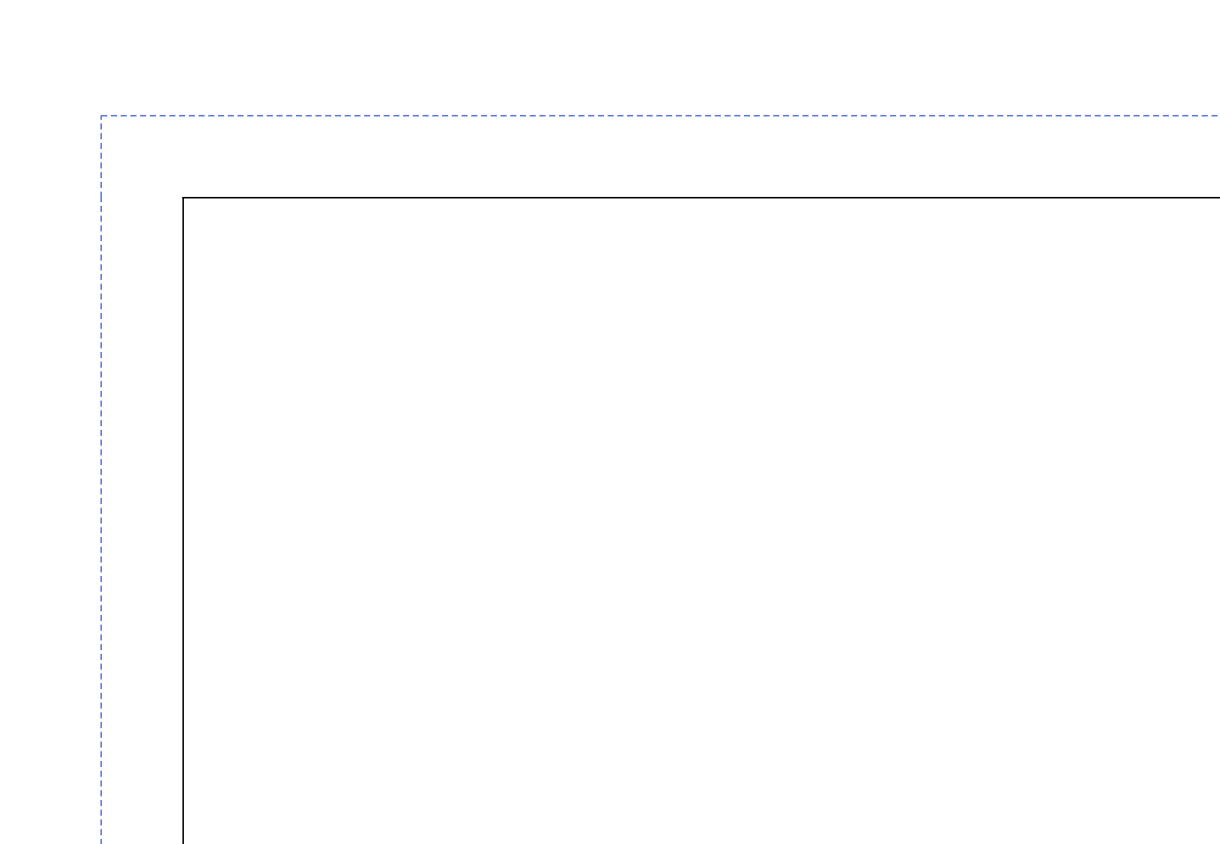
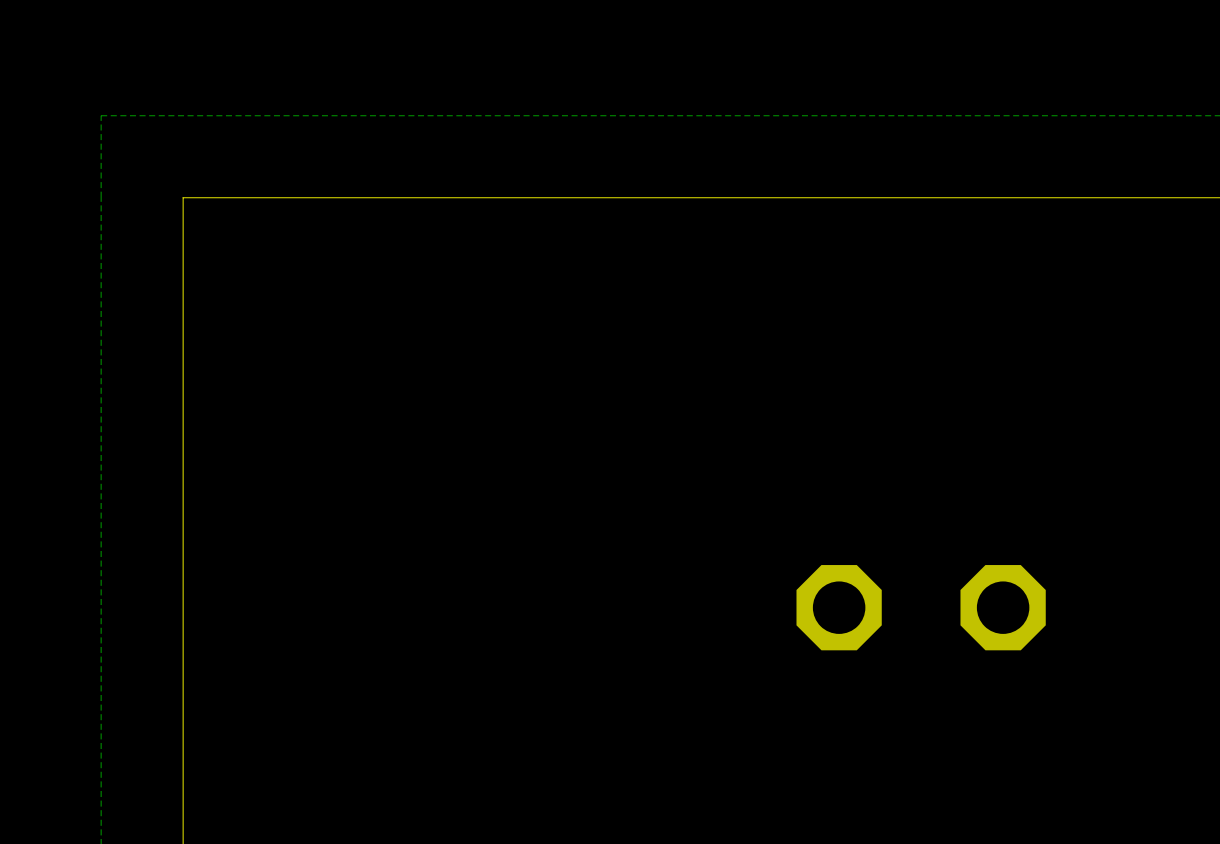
part: none -> (921, 607)

